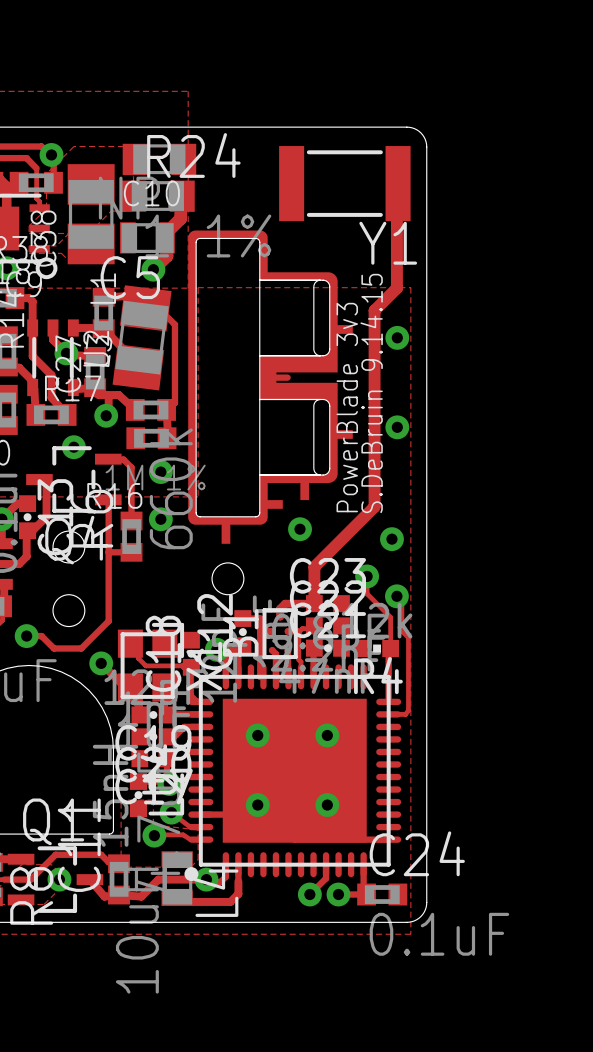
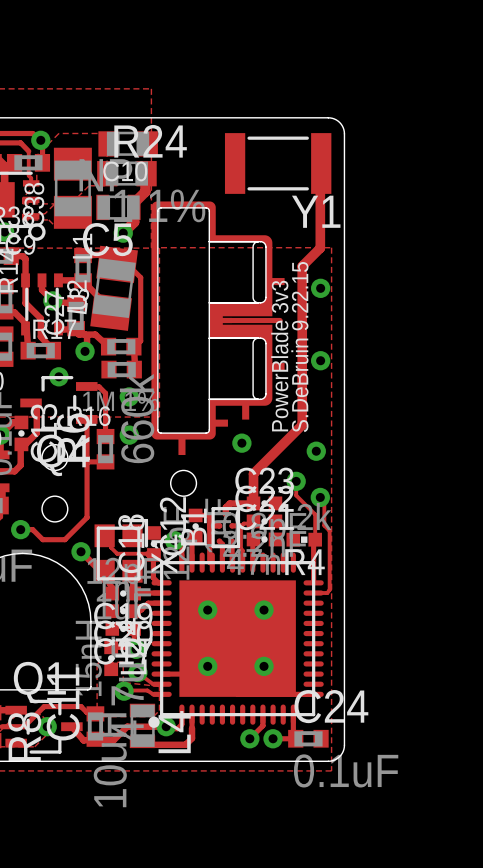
track: none -> (231, 320) (280, 320)
text: S.DeBruin 9.14.15 (371, 393) -> S.DeBruin 9.22.15 (299, 347)

